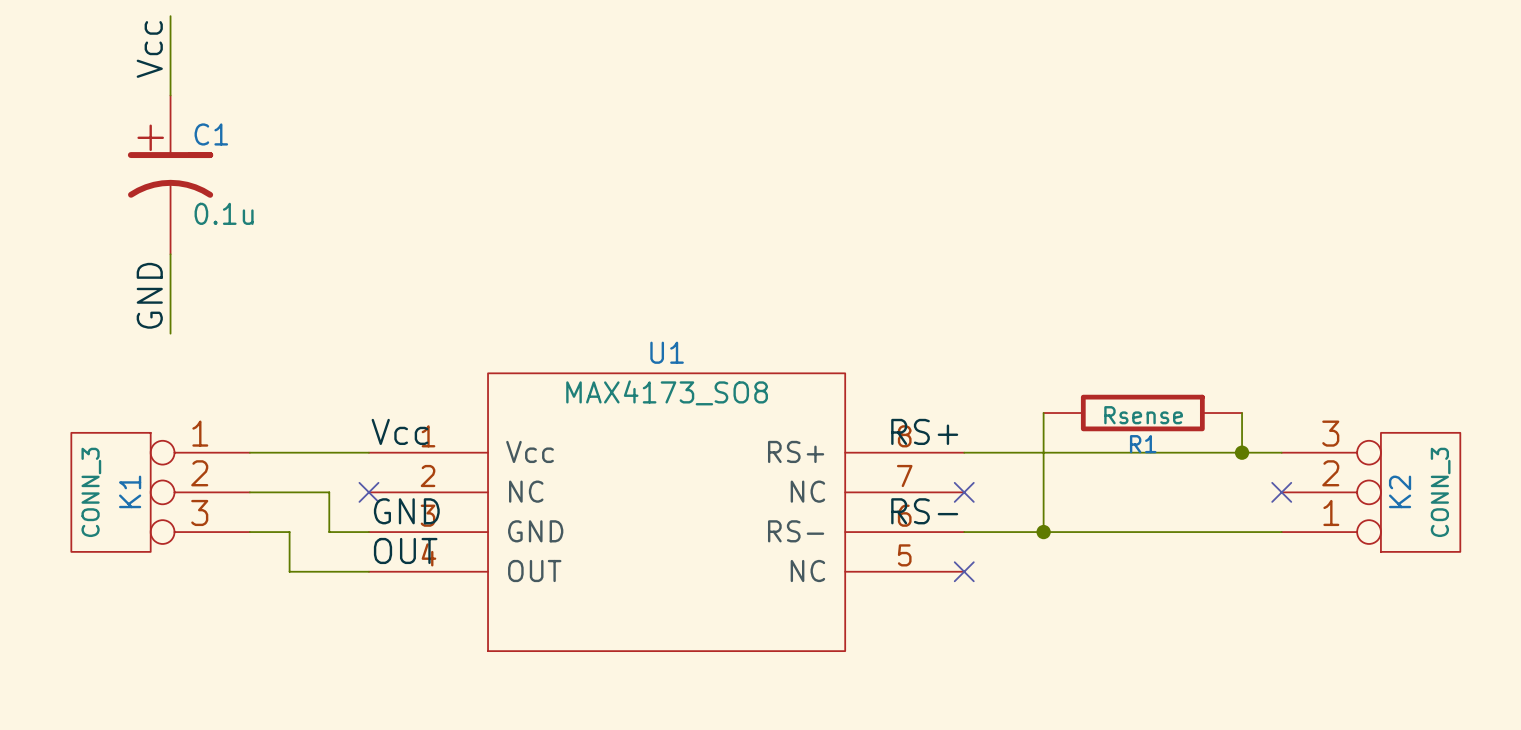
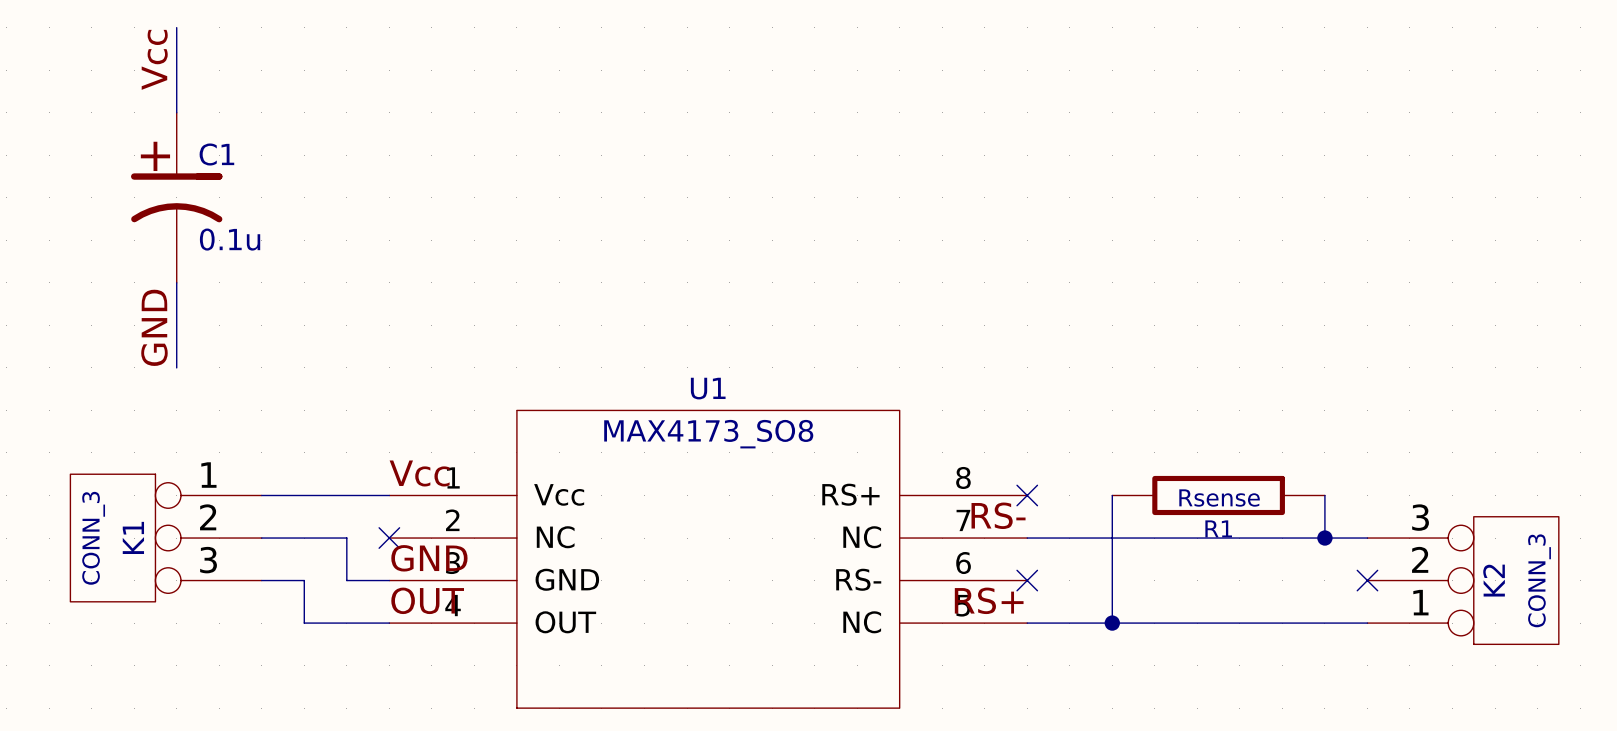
wire: (1043, 413) (1043, 452) -> (1112, 580) (1112, 623)
R1 position: (1142, 413) -> (1218, 495)
wire: (1242, 413) (1242, 452) -> (1324, 538) (1324, 495)
label position: RS+ (924, 431) -> RS+ (989, 600)
wire: (964, 452) (1281, 452) -> (1027, 538) (1367, 538)
no-connect mark: none -> (1027, 495)
junction position: (1242, 452) -> (1324, 538)
no-connect mark: (964, 492) -> none
no-connect mark position: (1281, 492) -> (1367, 580)
K2 position: (1371, 492) -> (1463, 580)
label position: RS- (924, 511) -> RS- (998, 515)
wire: (964, 532) (1281, 532) -> (1027, 623) (1367, 623)
no-connect mark: none -> (1027, 580)
junction position: (1043, 532) -> (1112, 623)
no-connect mark: (964, 571) -> none

